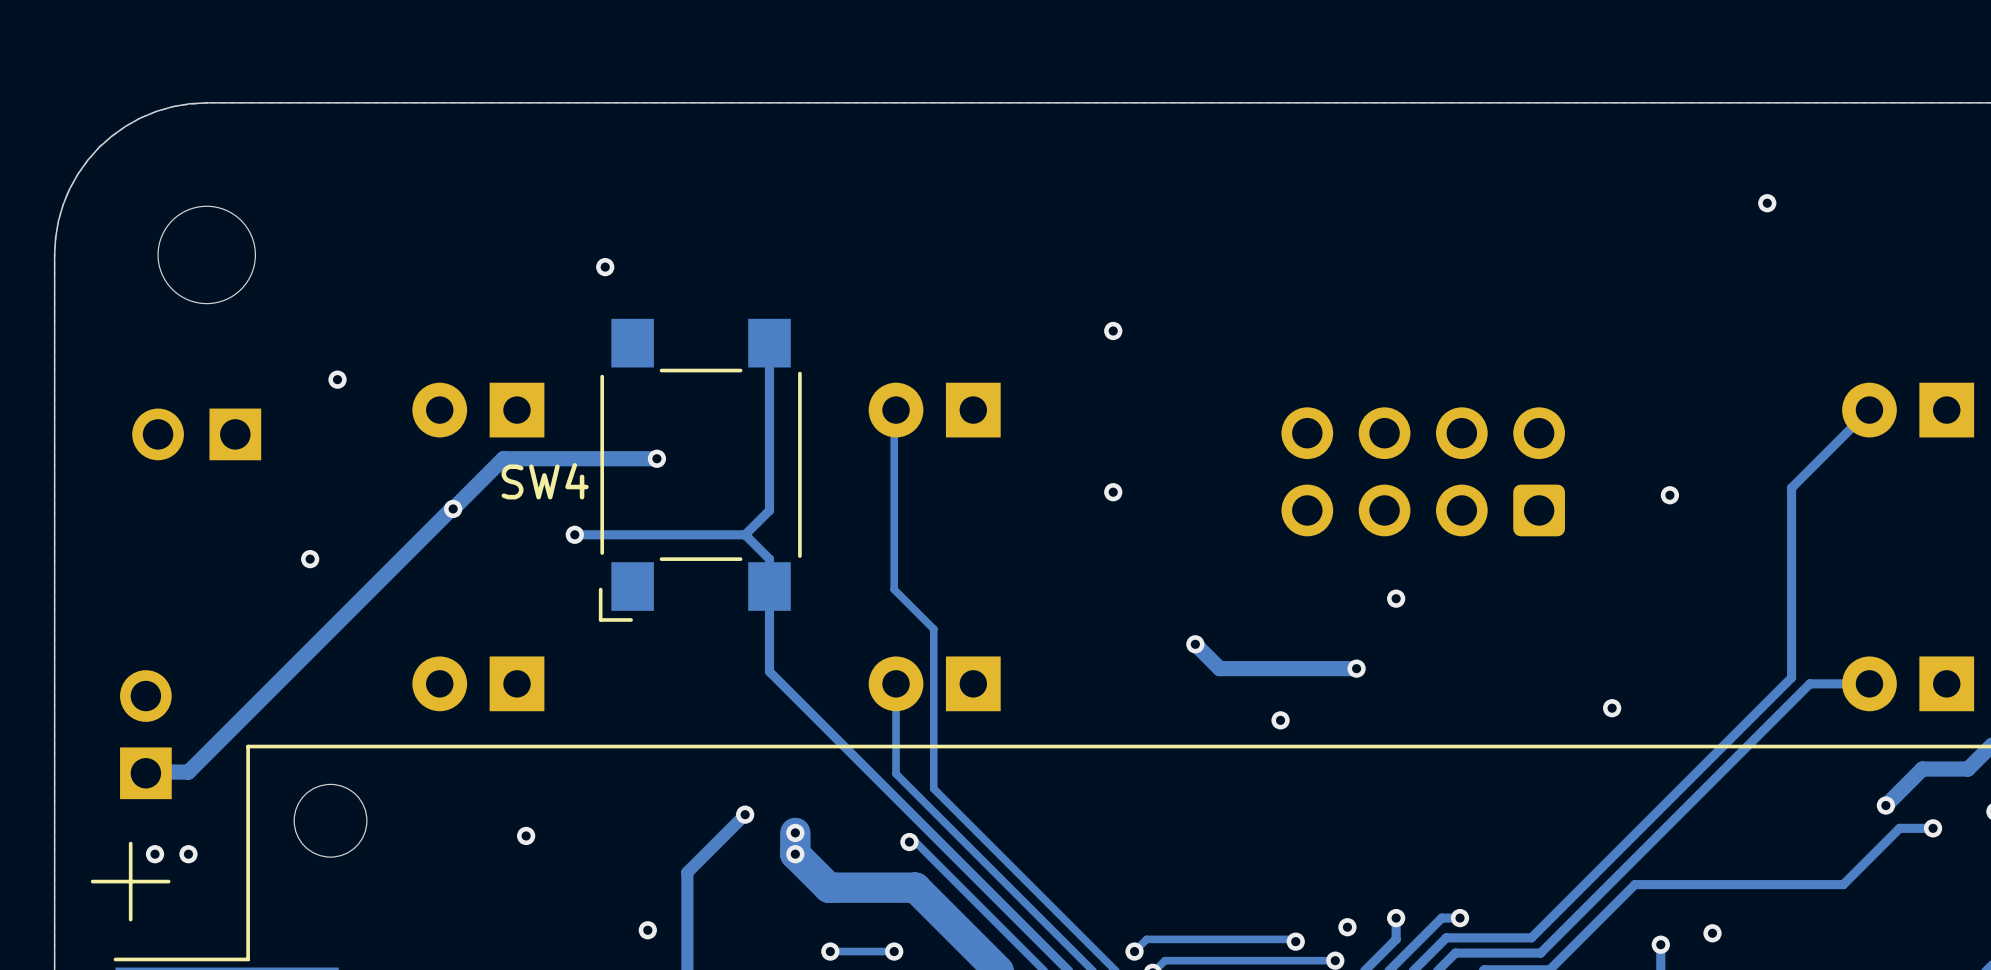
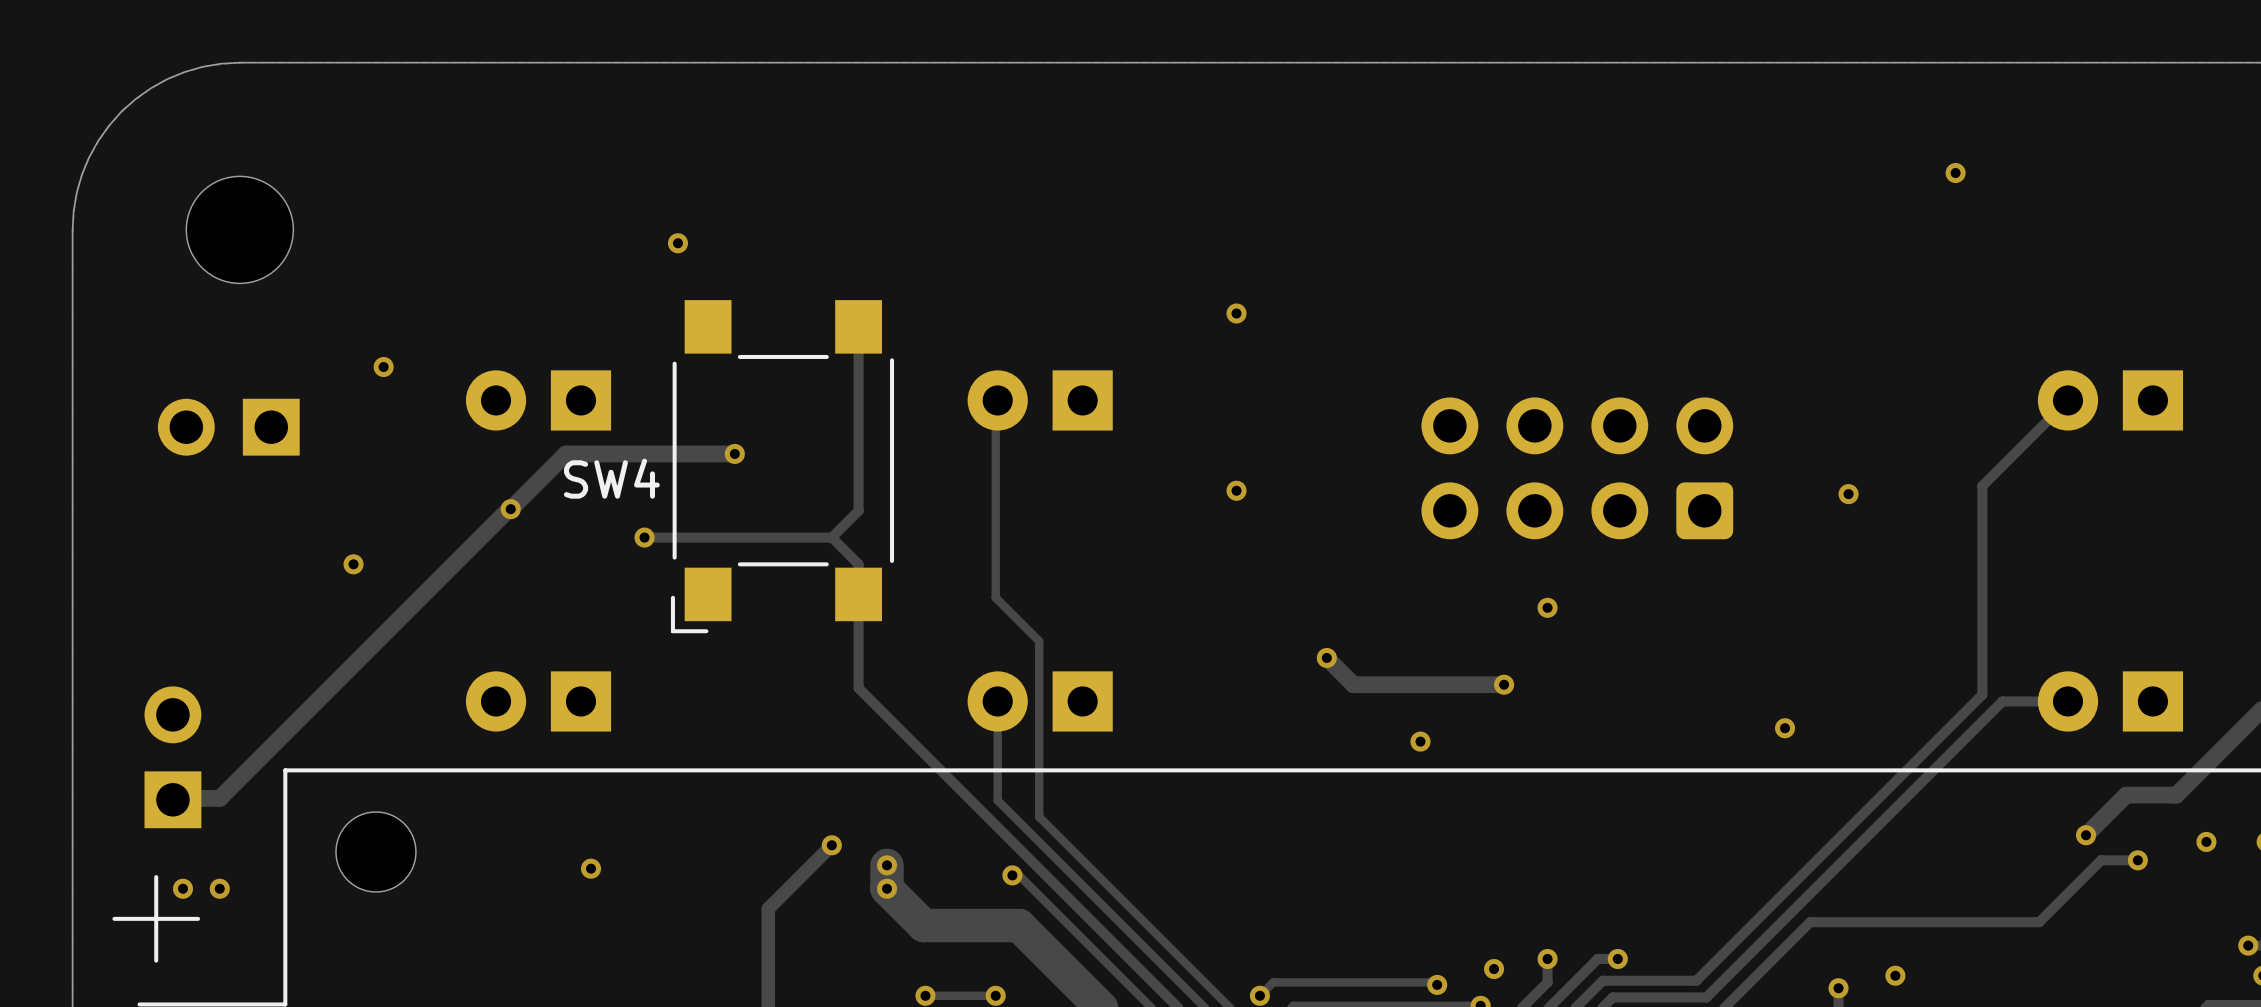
via: (647, 930) -> none

